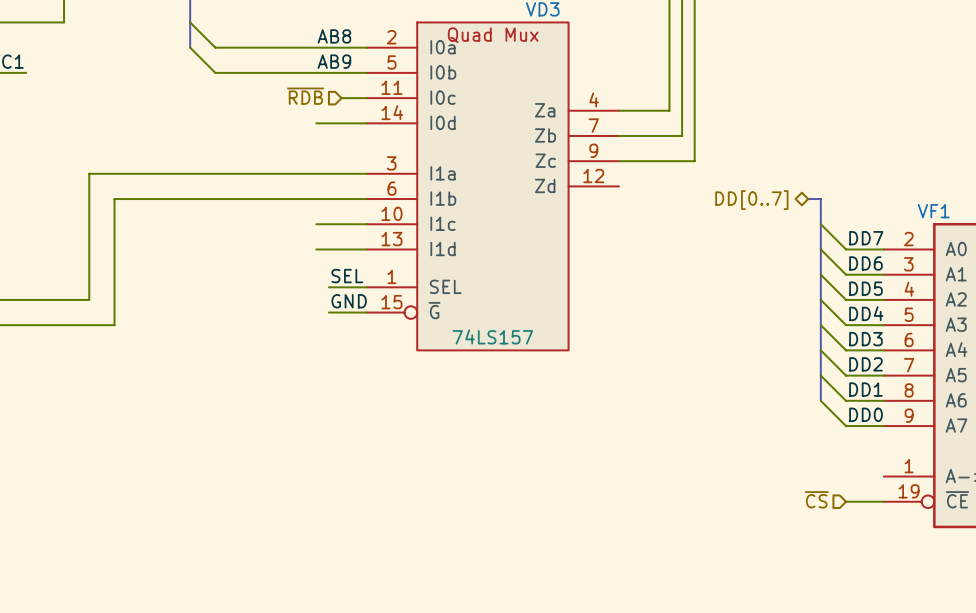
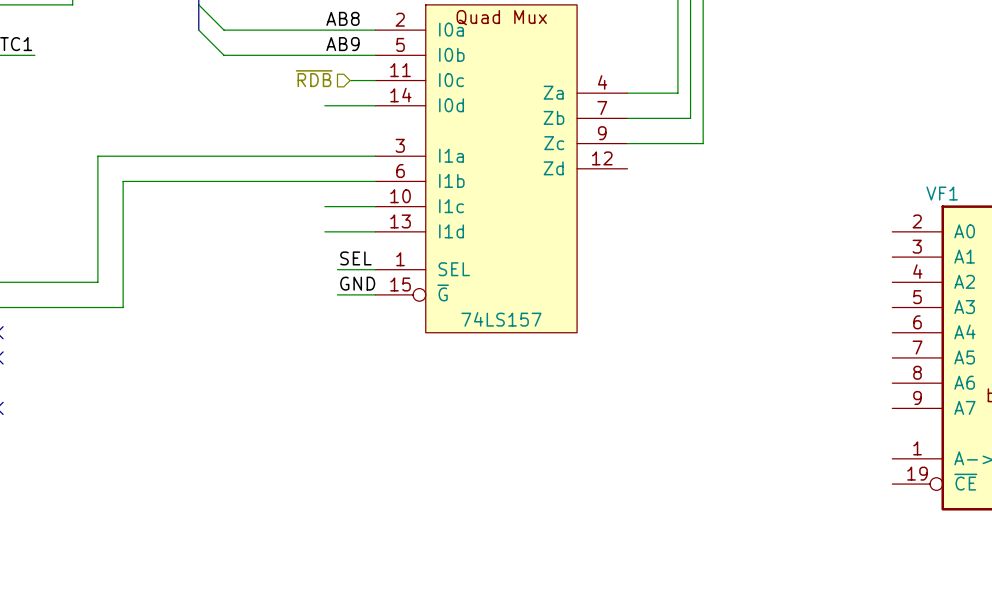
bus: (808, 199) (820, 199) (820, 400) -> none
hierarchical label: DD[0..7] (751, 200) -> none
wire: (820, 224) (846, 249) (883, 249) -> none
label: DD7 (866, 238) -> none
wire: (820, 249) (846, 274) (883, 274) -> none
label: DD6 (865, 263) -> none
wire: (820, 274) (846, 299) (883, 299) -> none
label: DD5 (865, 288) -> none
wire: (820, 299) (846, 325) (883, 325) -> none
label: DD4 (866, 313) -> none
wire: (820, 325) (846, 350) (883, 350) -> none
label: DD3 (865, 339) -> none
wire: (820, 350) (846, 375) (883, 375) -> none
label: DD2 (865, 364) -> none
wire: (820, 375) (846, 400) (883, 400) -> none
label: DD1 (865, 389) -> none
wire: (820, 400) (846, 426) (883, 426) -> none
label: DD0 (865, 414) -> none
hierarchical label: ~{CS} (816, 499) -> none
wire: (846, 501) (883, 501) -> none

